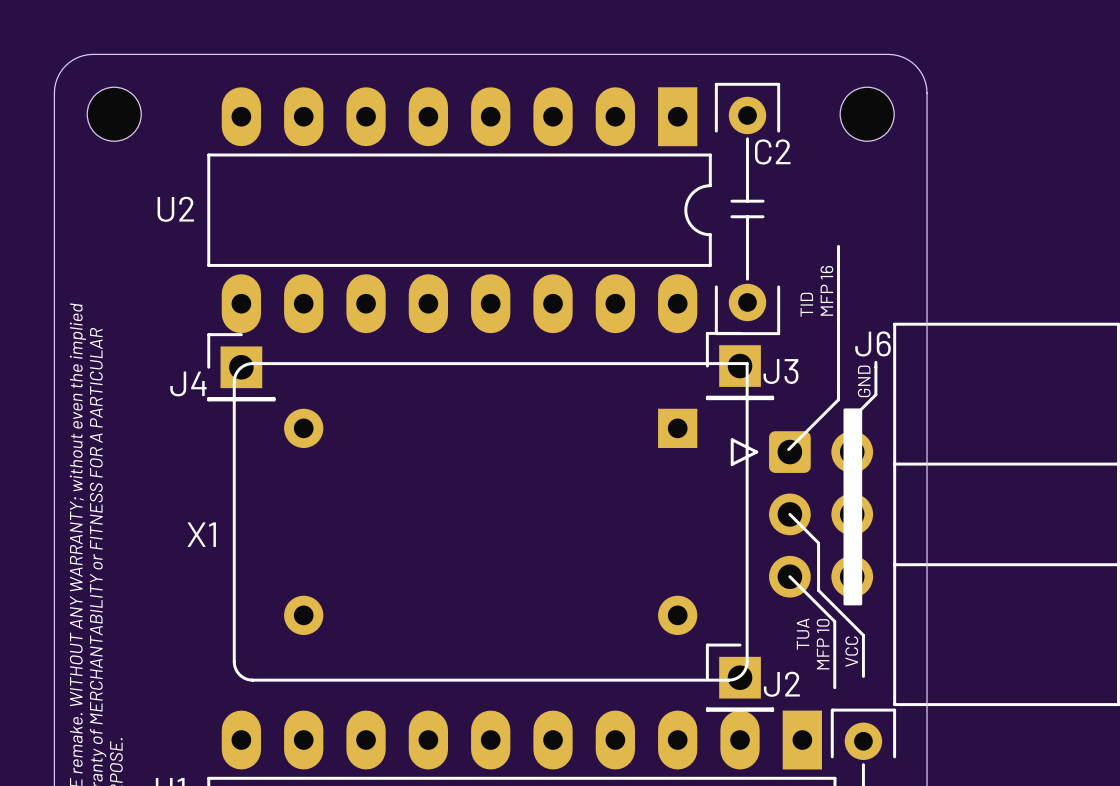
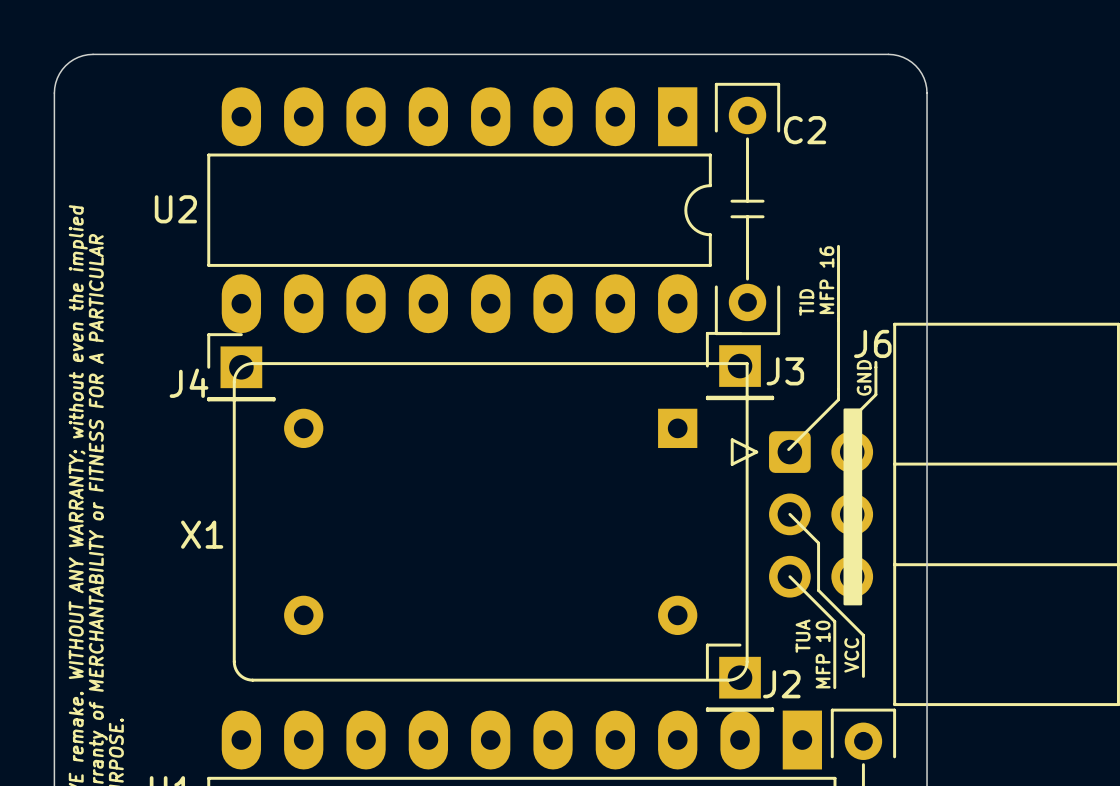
part: (114, 114) -> none
part: (867, 114) -> none
C2 name position: C2 (772, 151) -> C2 (805, 130)

